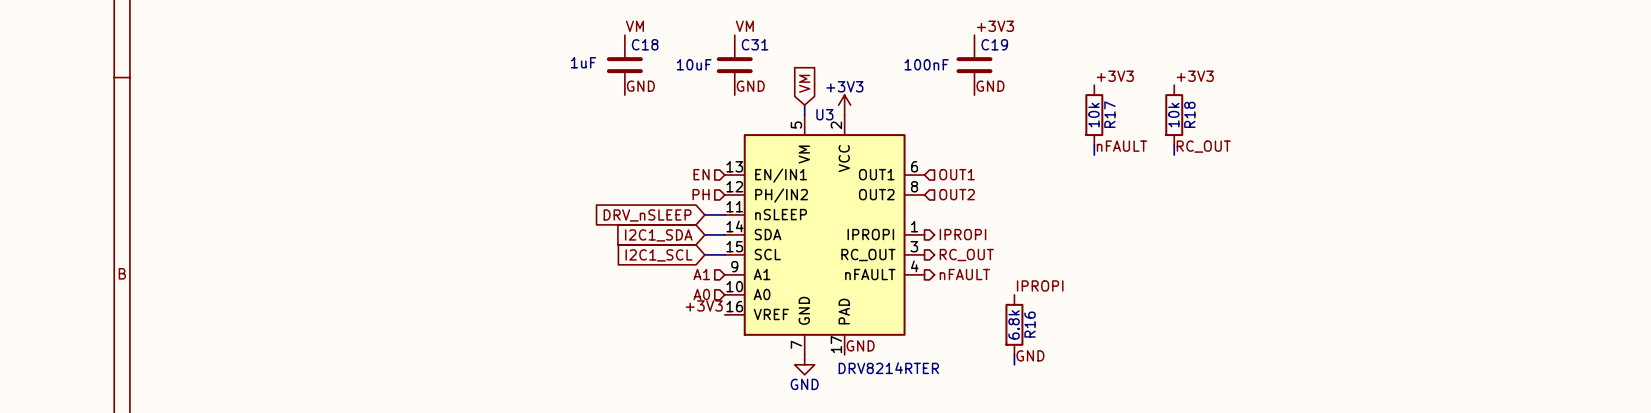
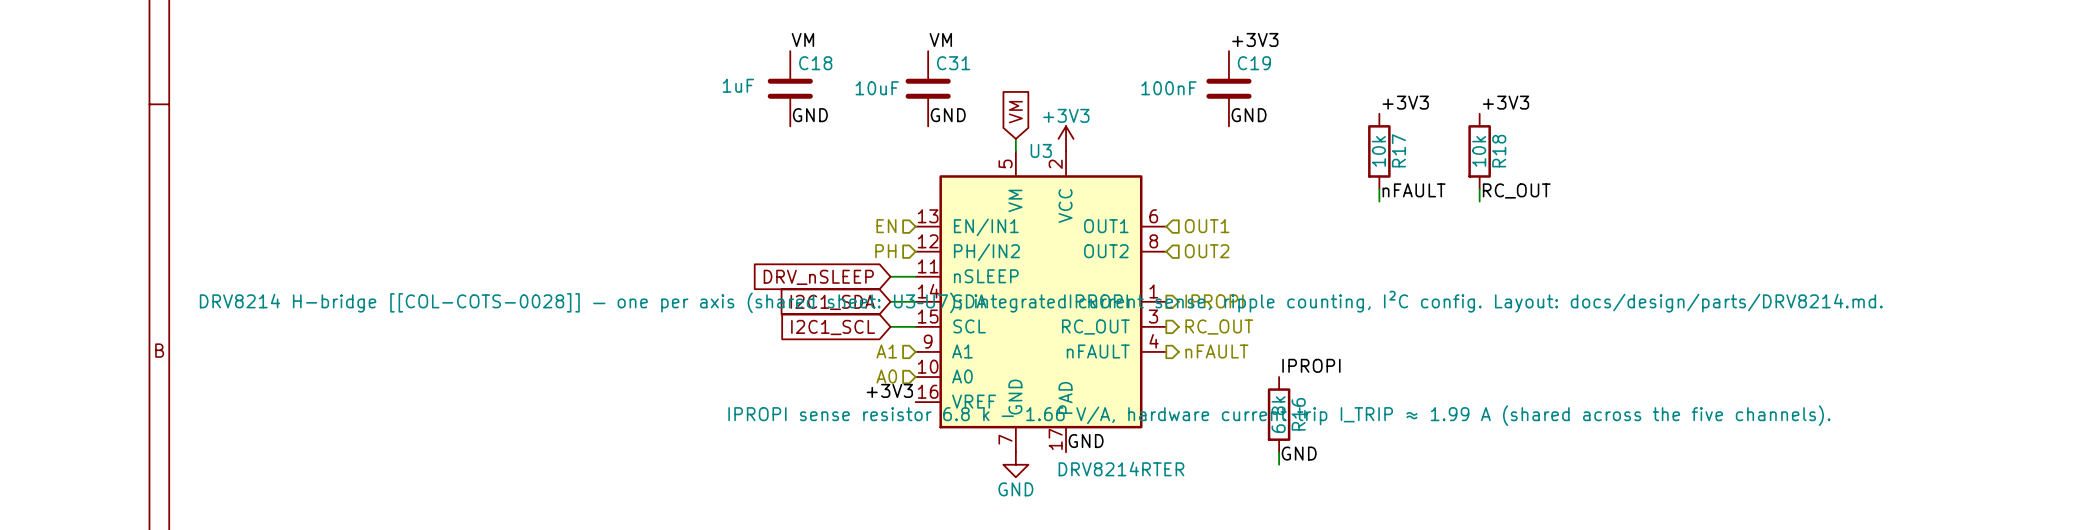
U3 text: none -> DRV8214 H-bridge [[COL-COTS-0028]] — one per axis (shared sheet: U3–U7); integrated current sense, ripple counting, I²C config. Layout: docs/design/parts/DRV8214.md. (1041, 301)
R16 text: none -> IPROPI sense resistor 6.8 k — 1.66 V/A, hardware current trip I_TRIP ≈ 1.99 A (shared across the five channels). (1279, 415)

